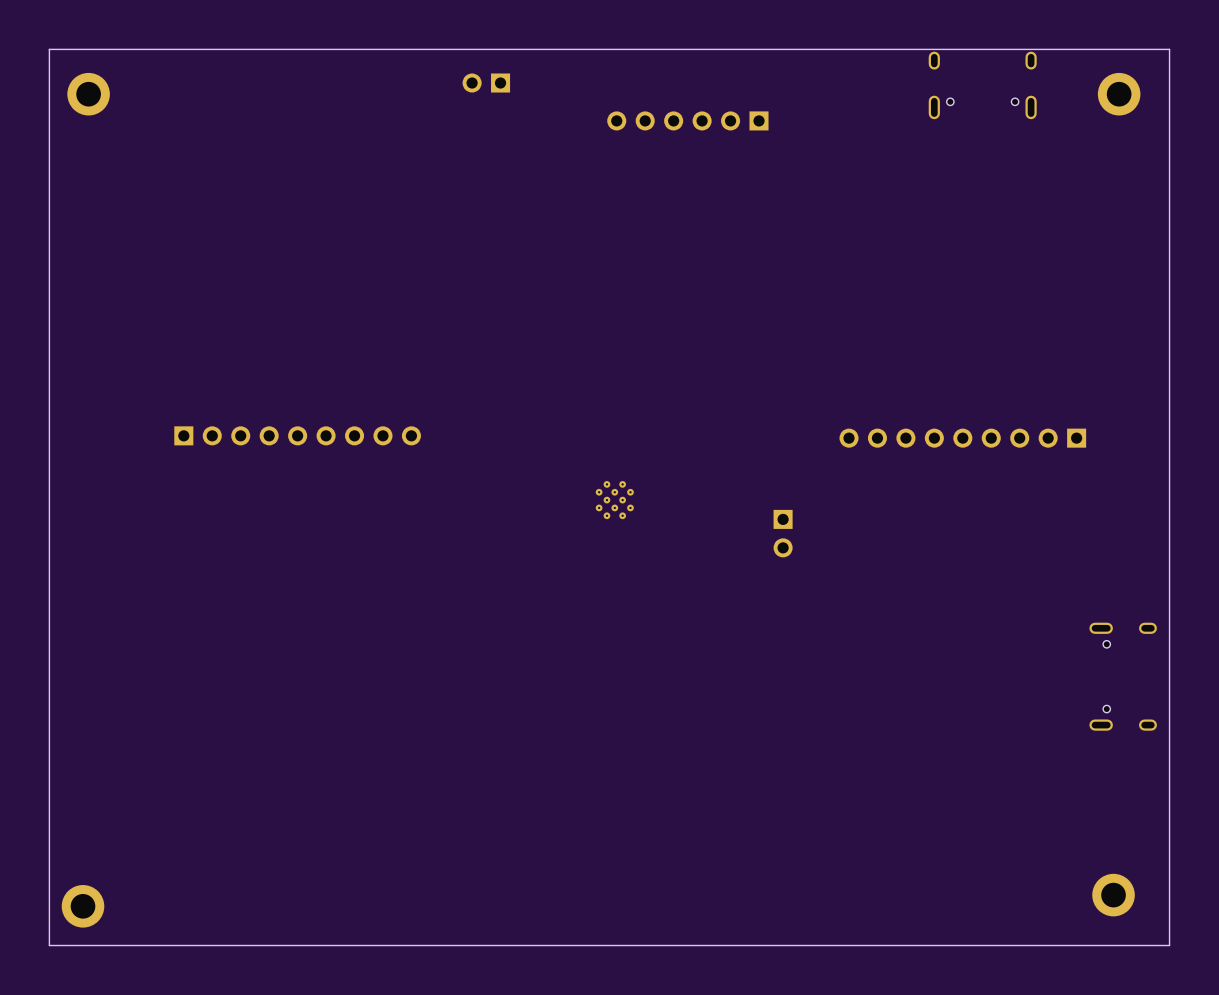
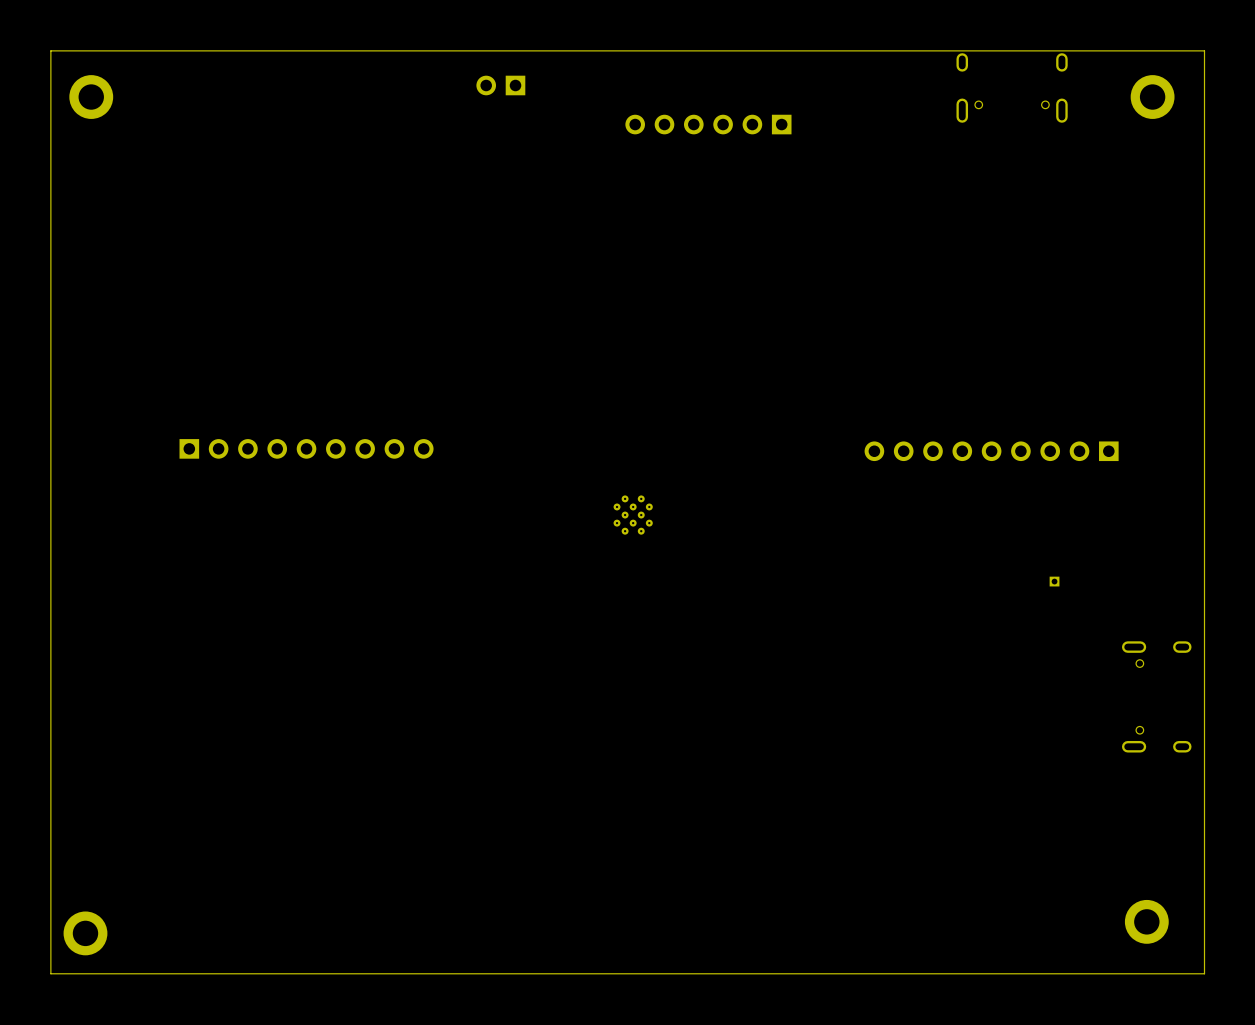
part: (783, 533) -> none
part: none -> (1054, 581)

